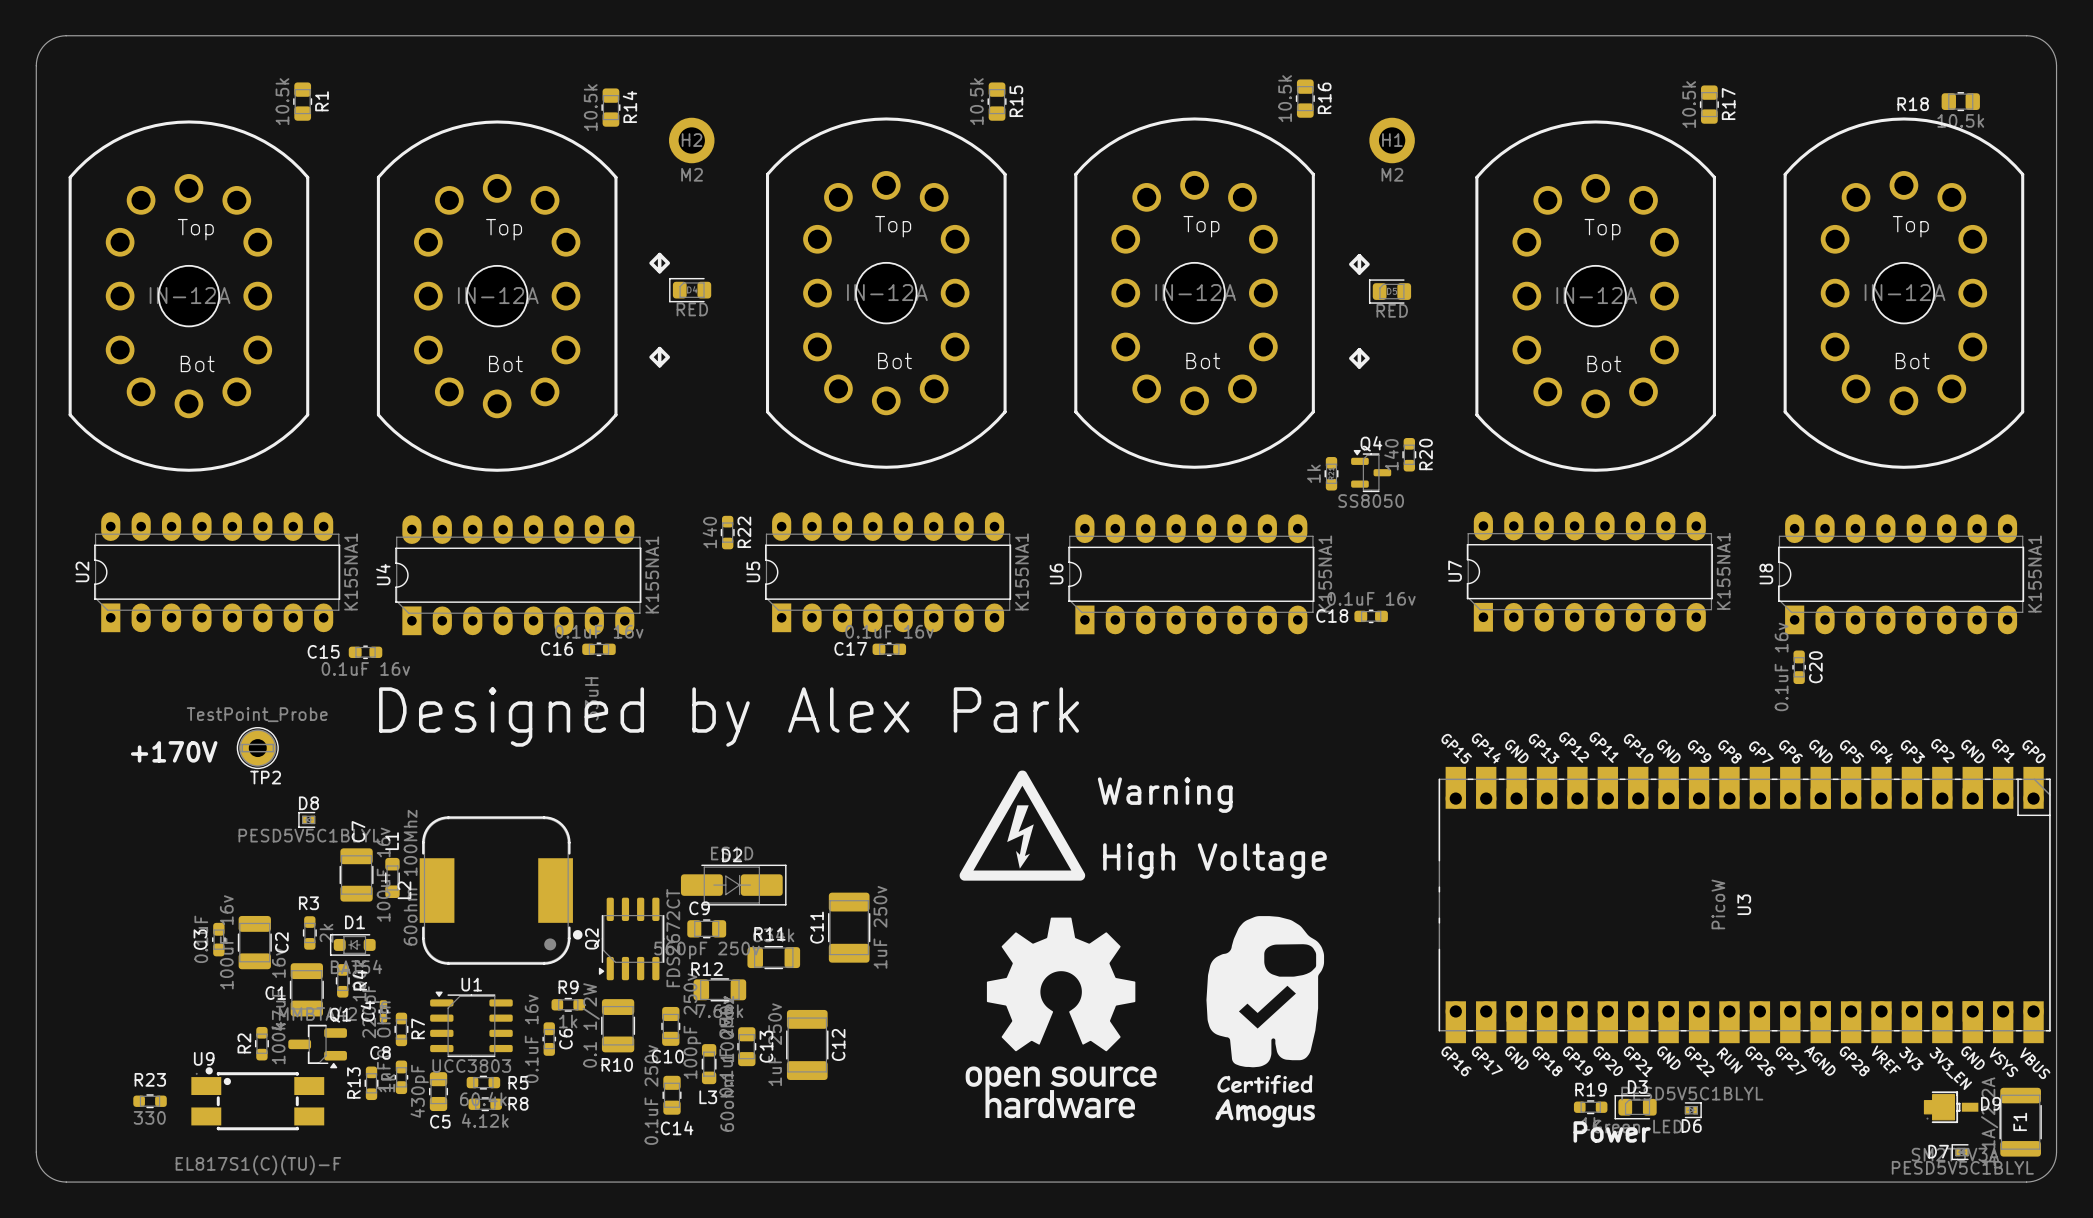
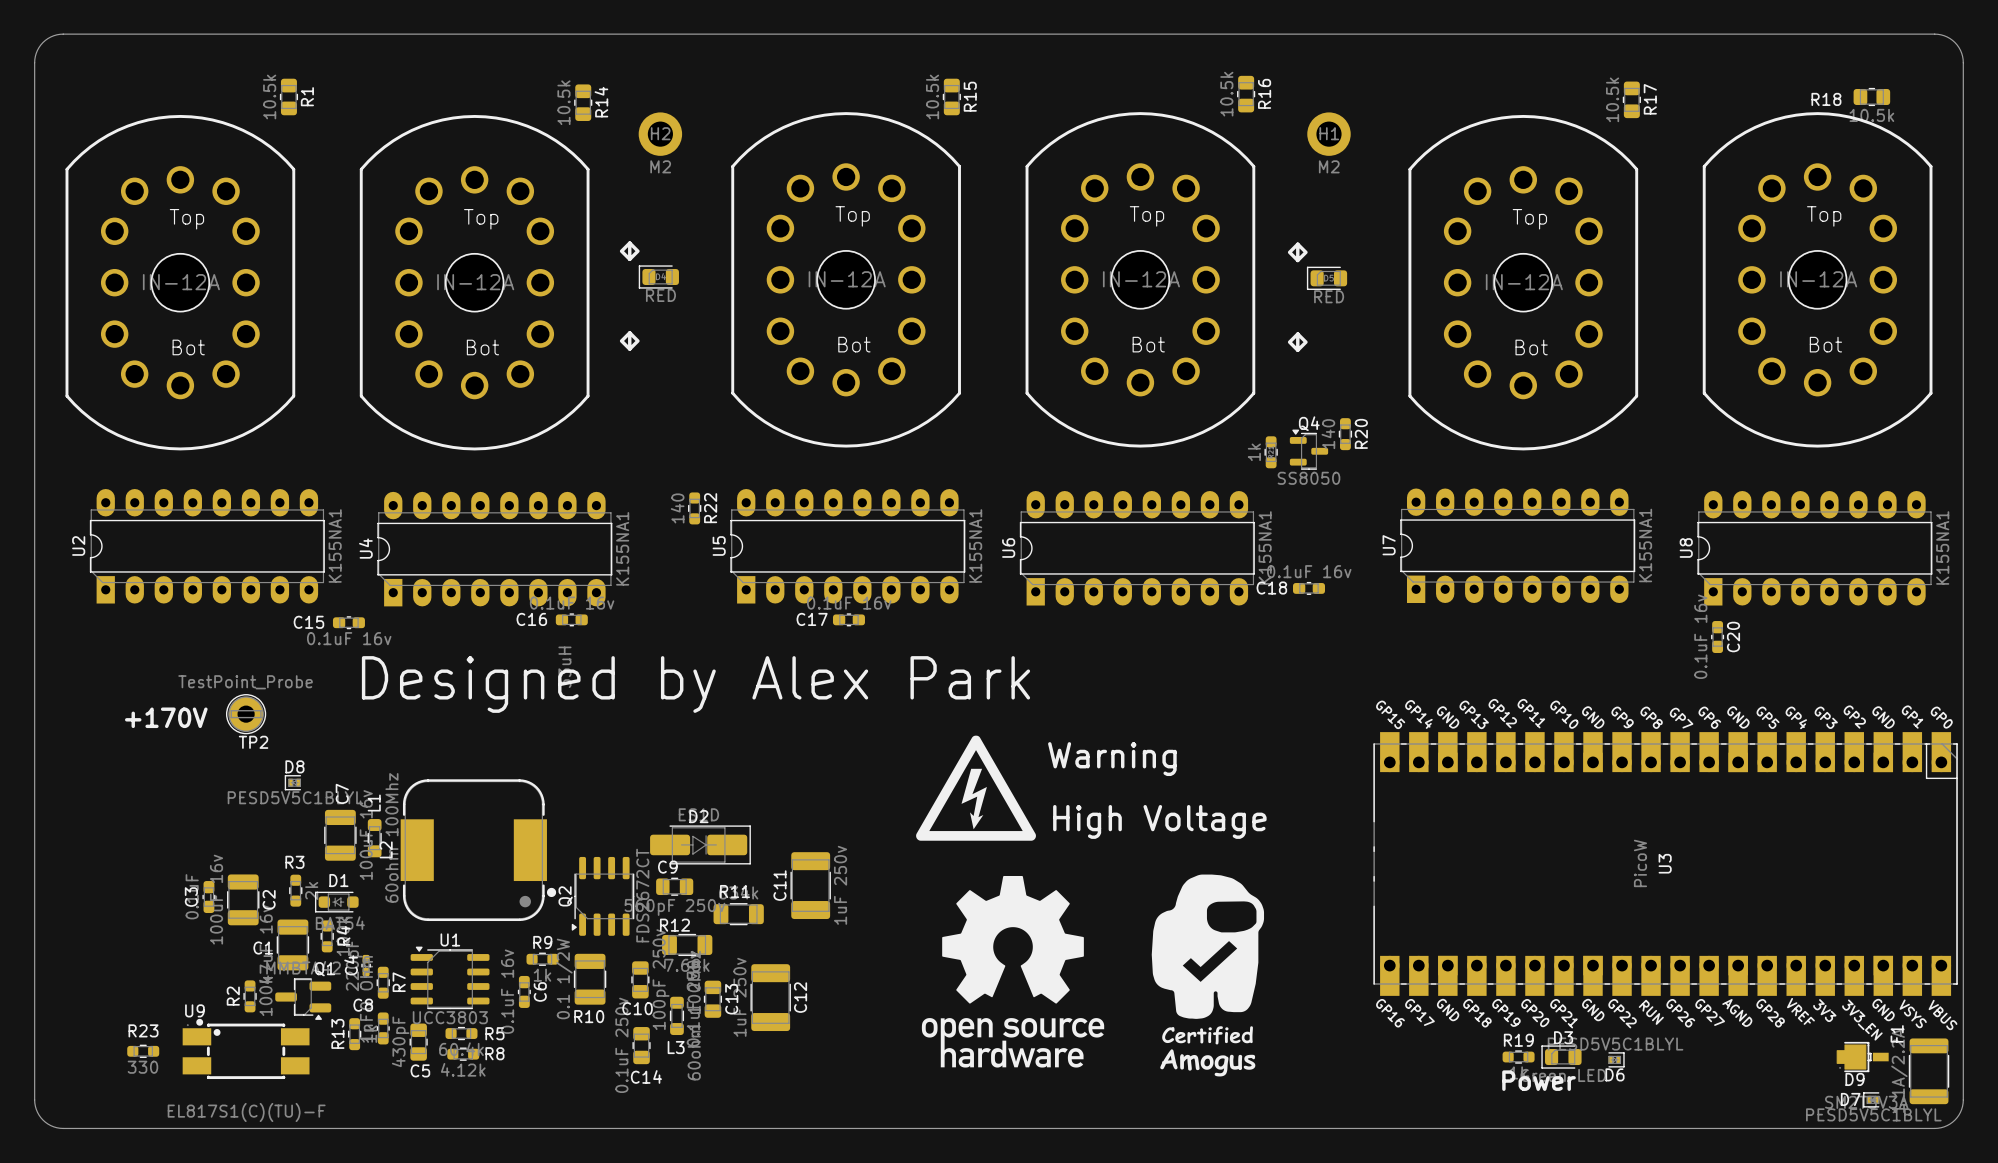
D9 name position: D9 (1990, 1103) -> D9 (1855, 1079)
F1 name position: F1 (2020, 1121) -> F1 (1897, 1033)

